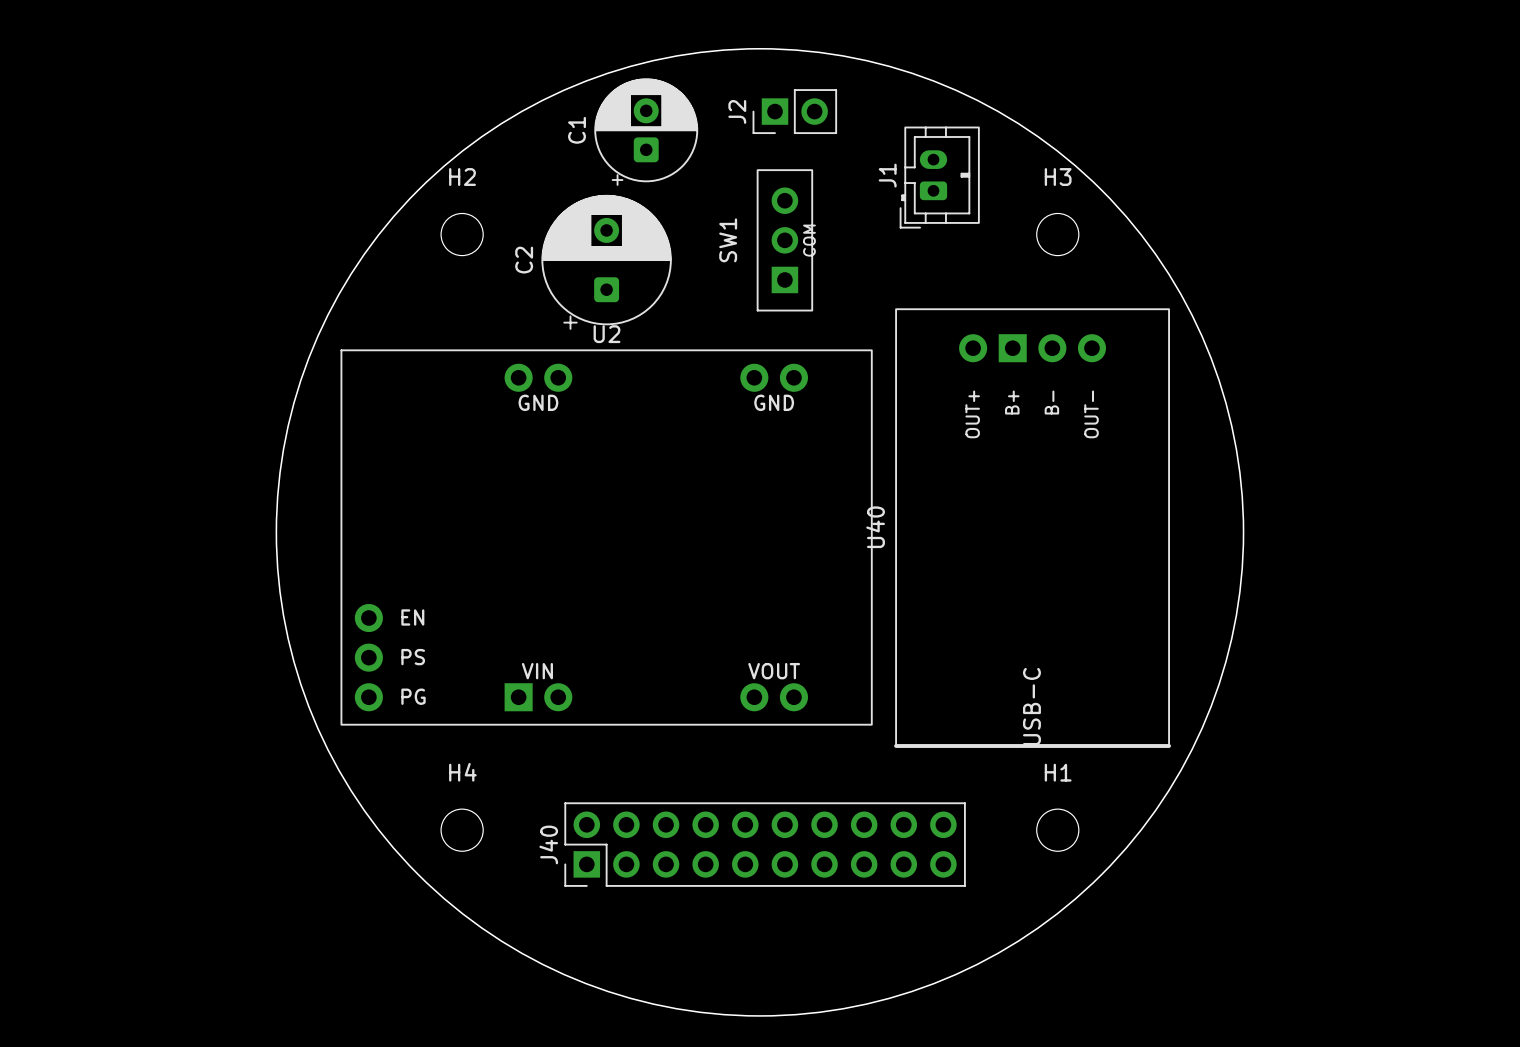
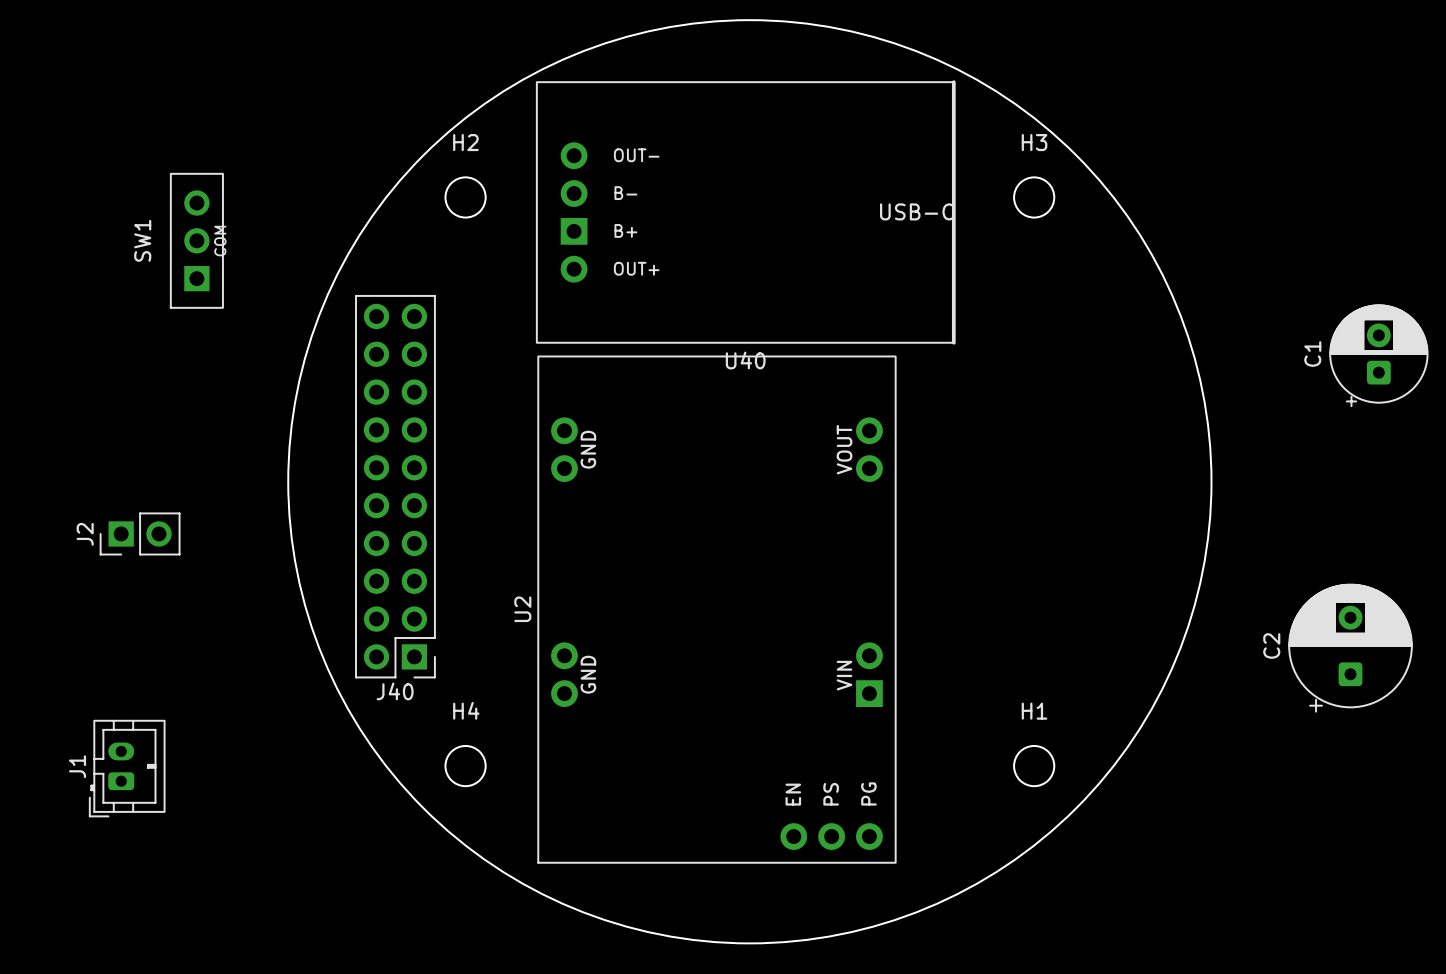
J2 position: (794, 111) -> (140, 533)
C1 position: (646, 132) -> (1378, 355)
J1 position: (939, 177) -> (127, 768)
SW1 position: (784, 240) -> (196, 240)
C2 position: (606, 262) -> (1350, 648)
U40 rotation: 0° (1032, 528) -> 90° counterclockwise (745, 212)
U40 position: (1032, 528) -> (745, 212)
U2 rotation: 0° (606, 537) -> 90° counterclockwise (716, 609)
J40 rotation: 0° (765, 844) -> 90° counterclockwise (395, 486)
J40 position: (765, 844) -> (395, 486)

